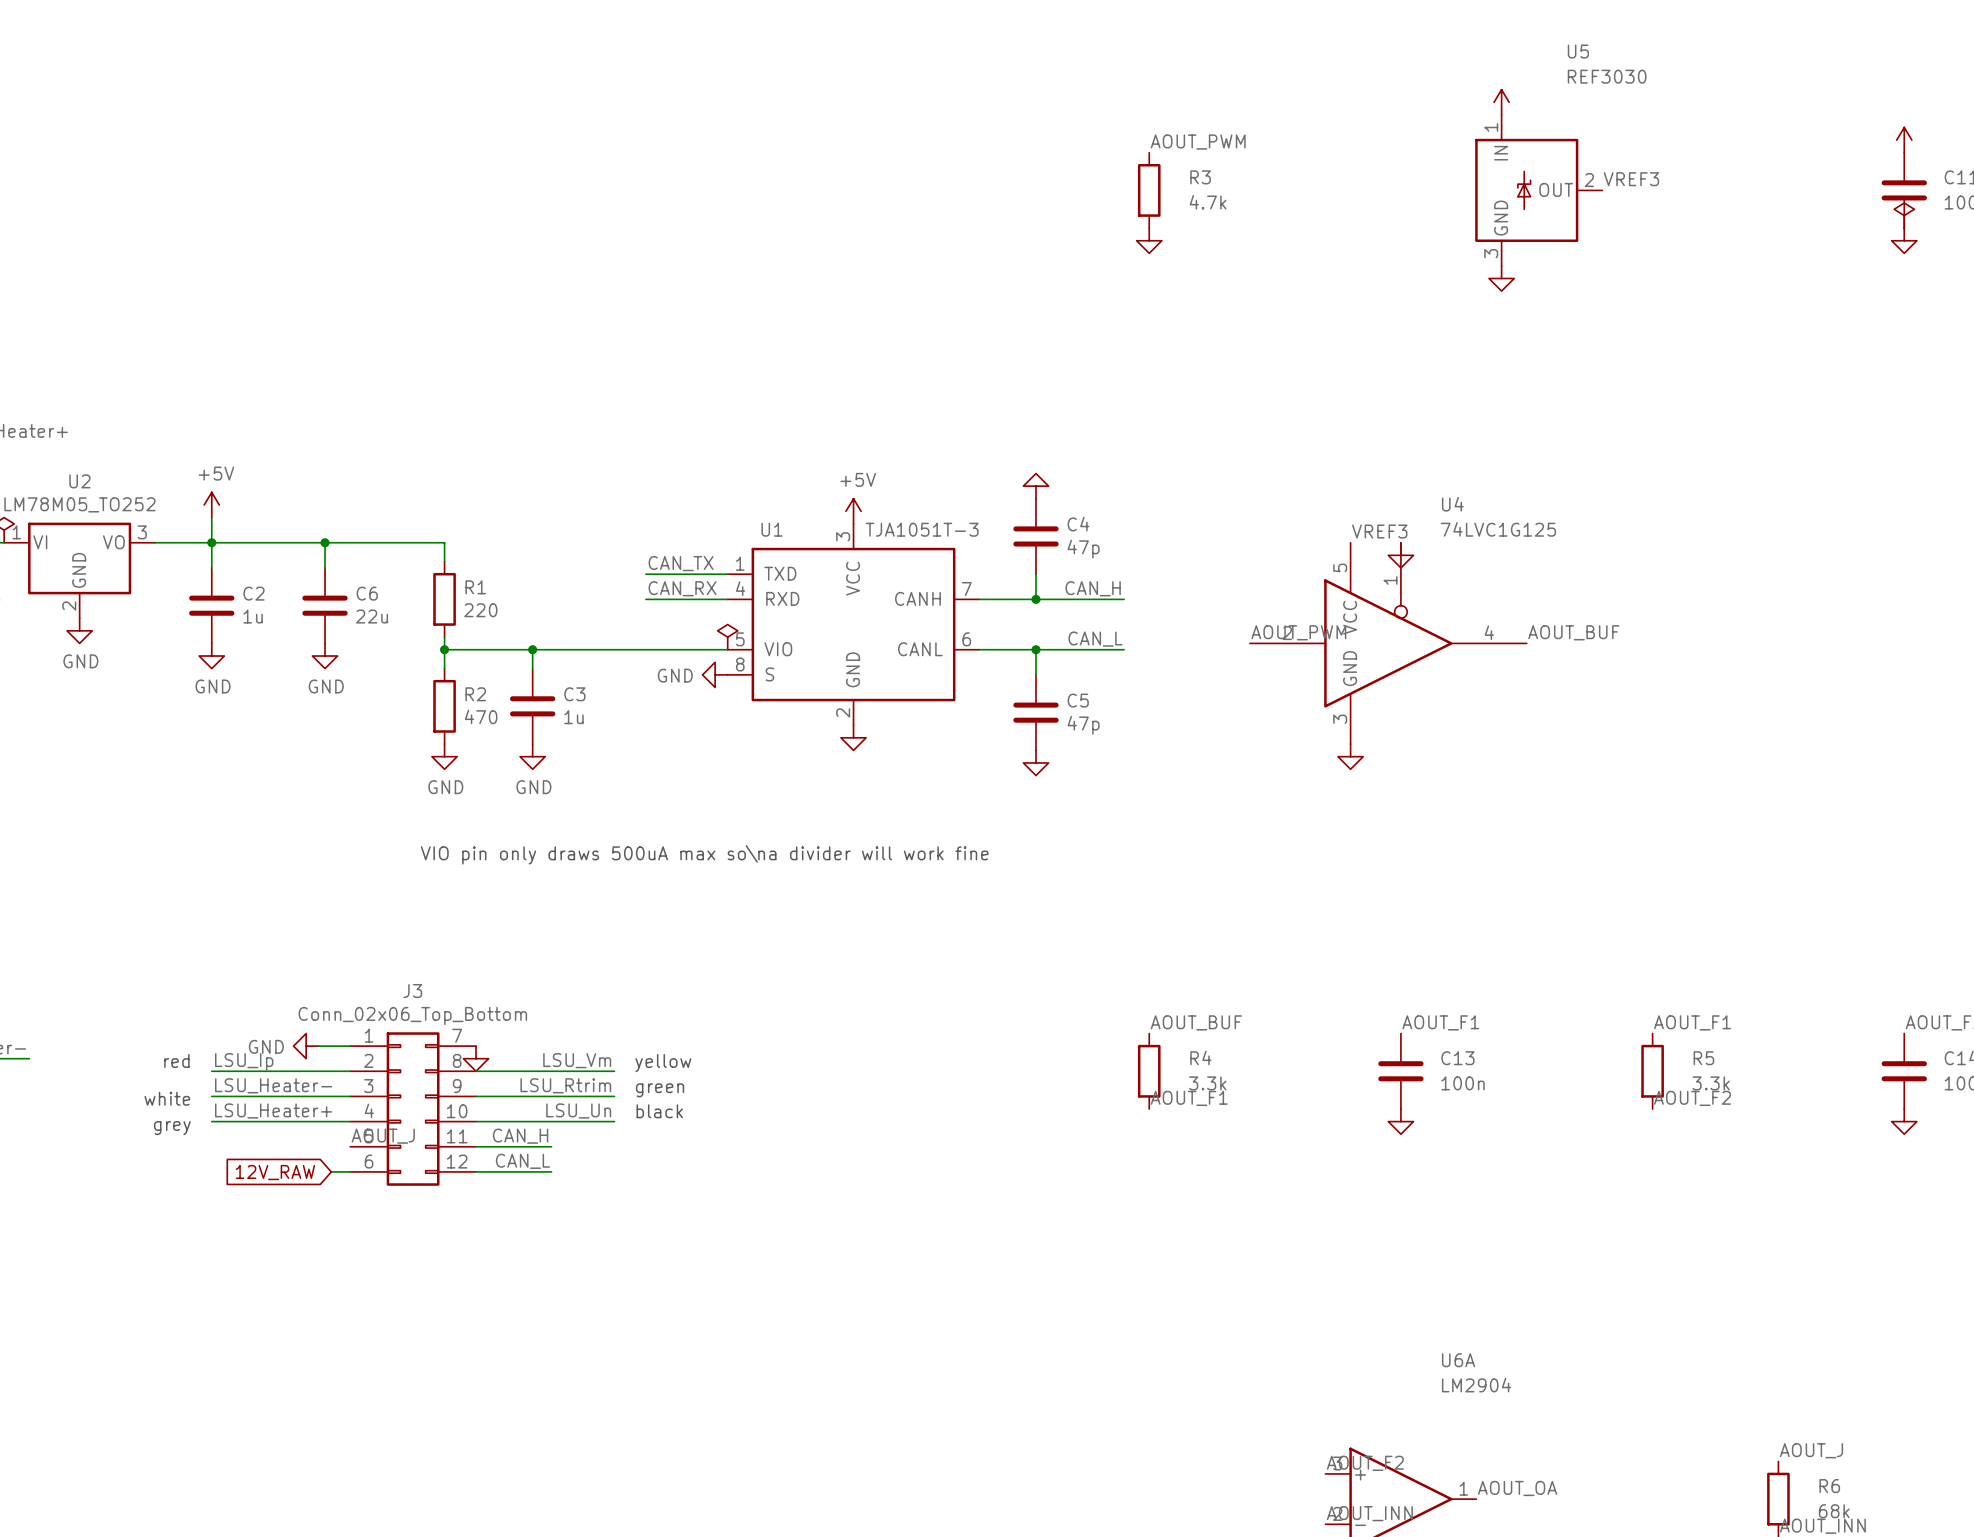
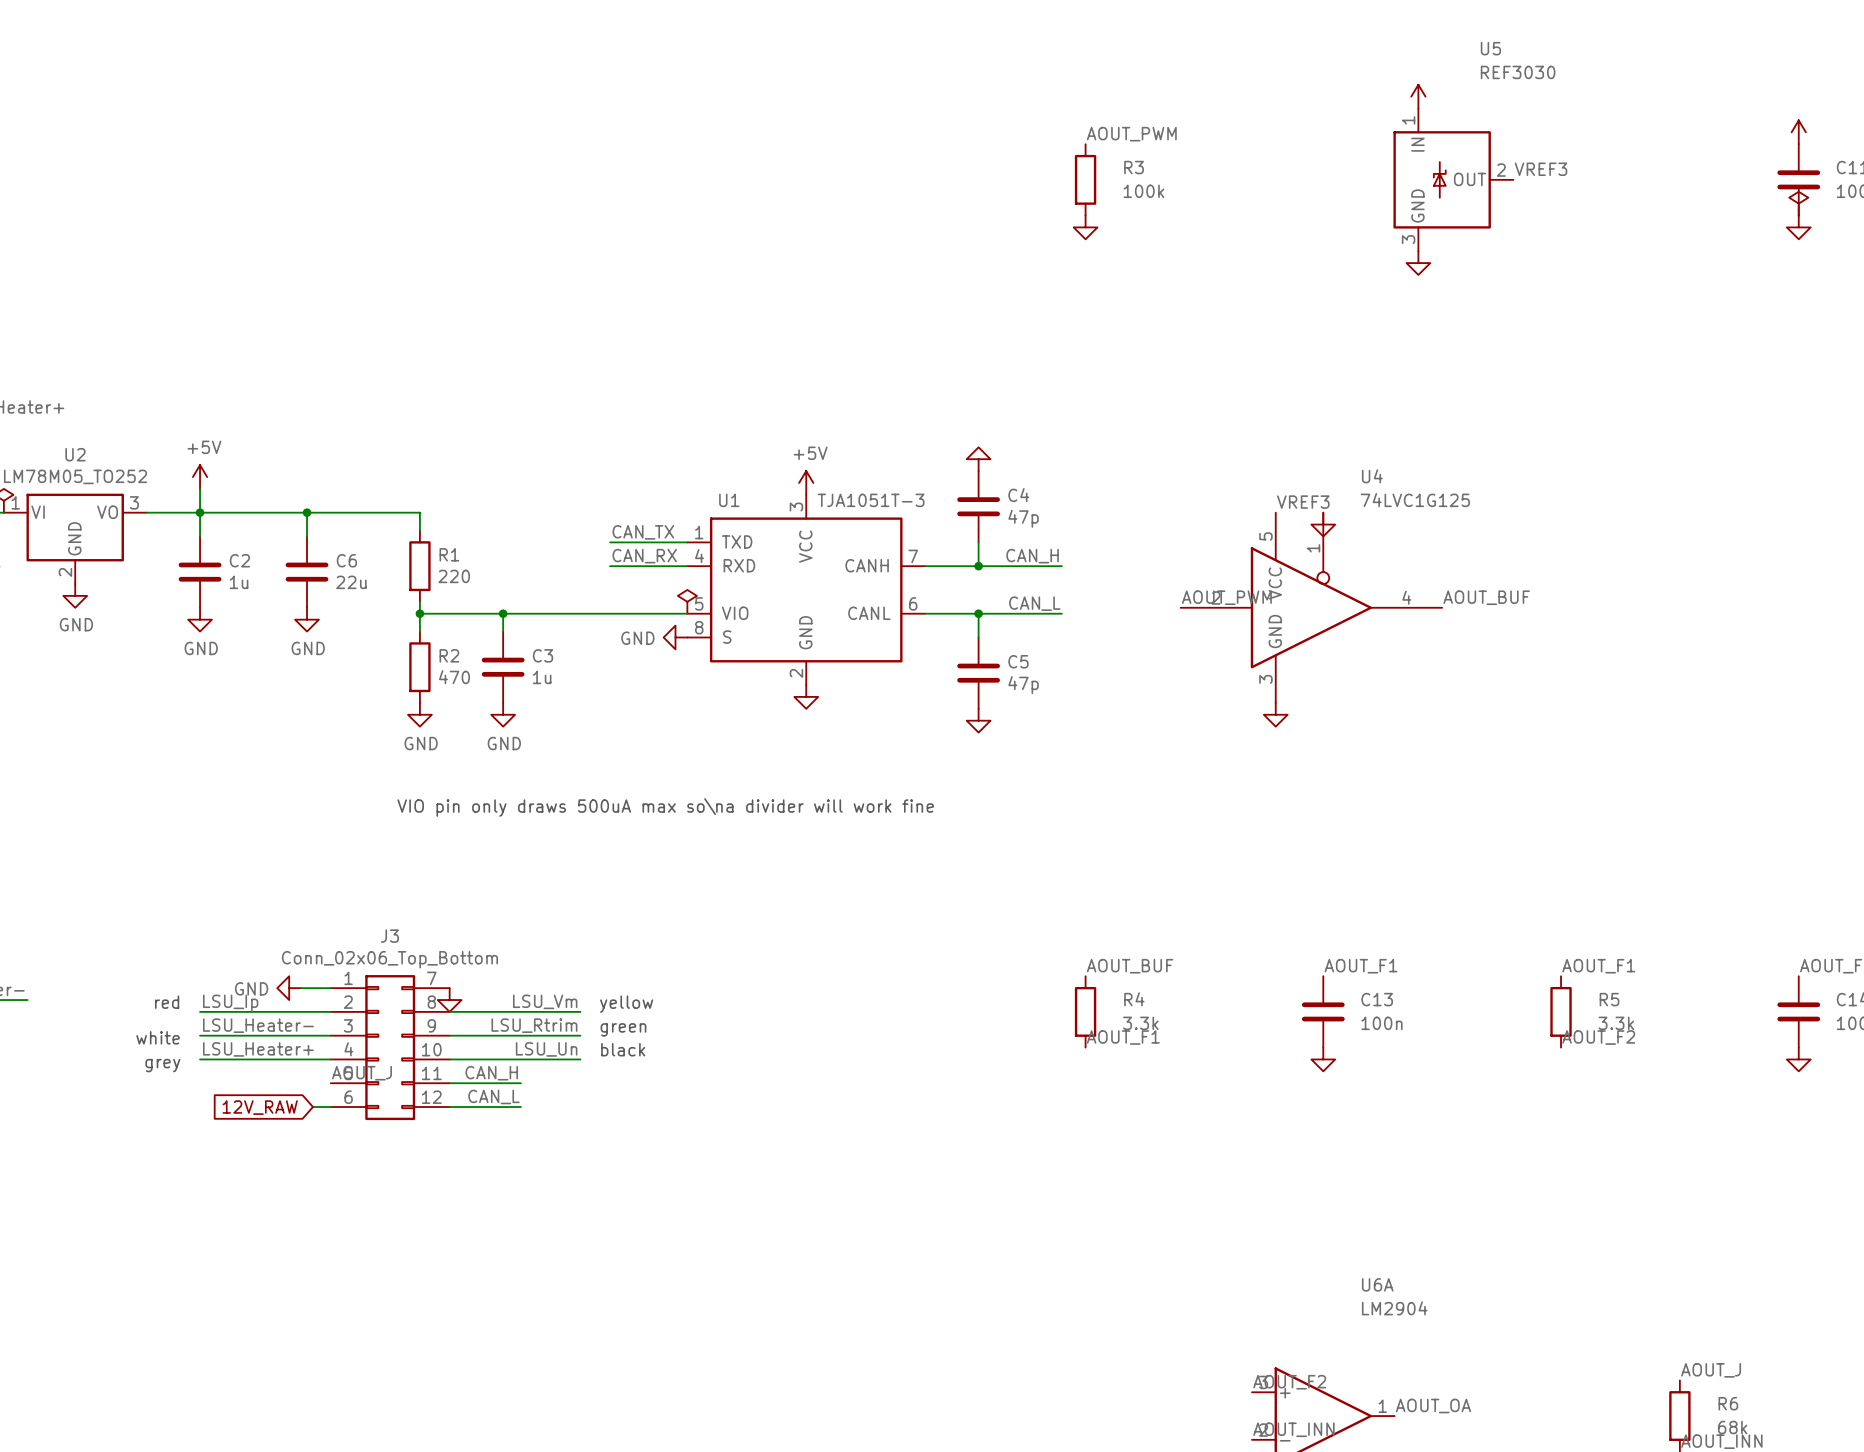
R3 value: 4.7k (1208, 202) -> 100k (1143, 191)

